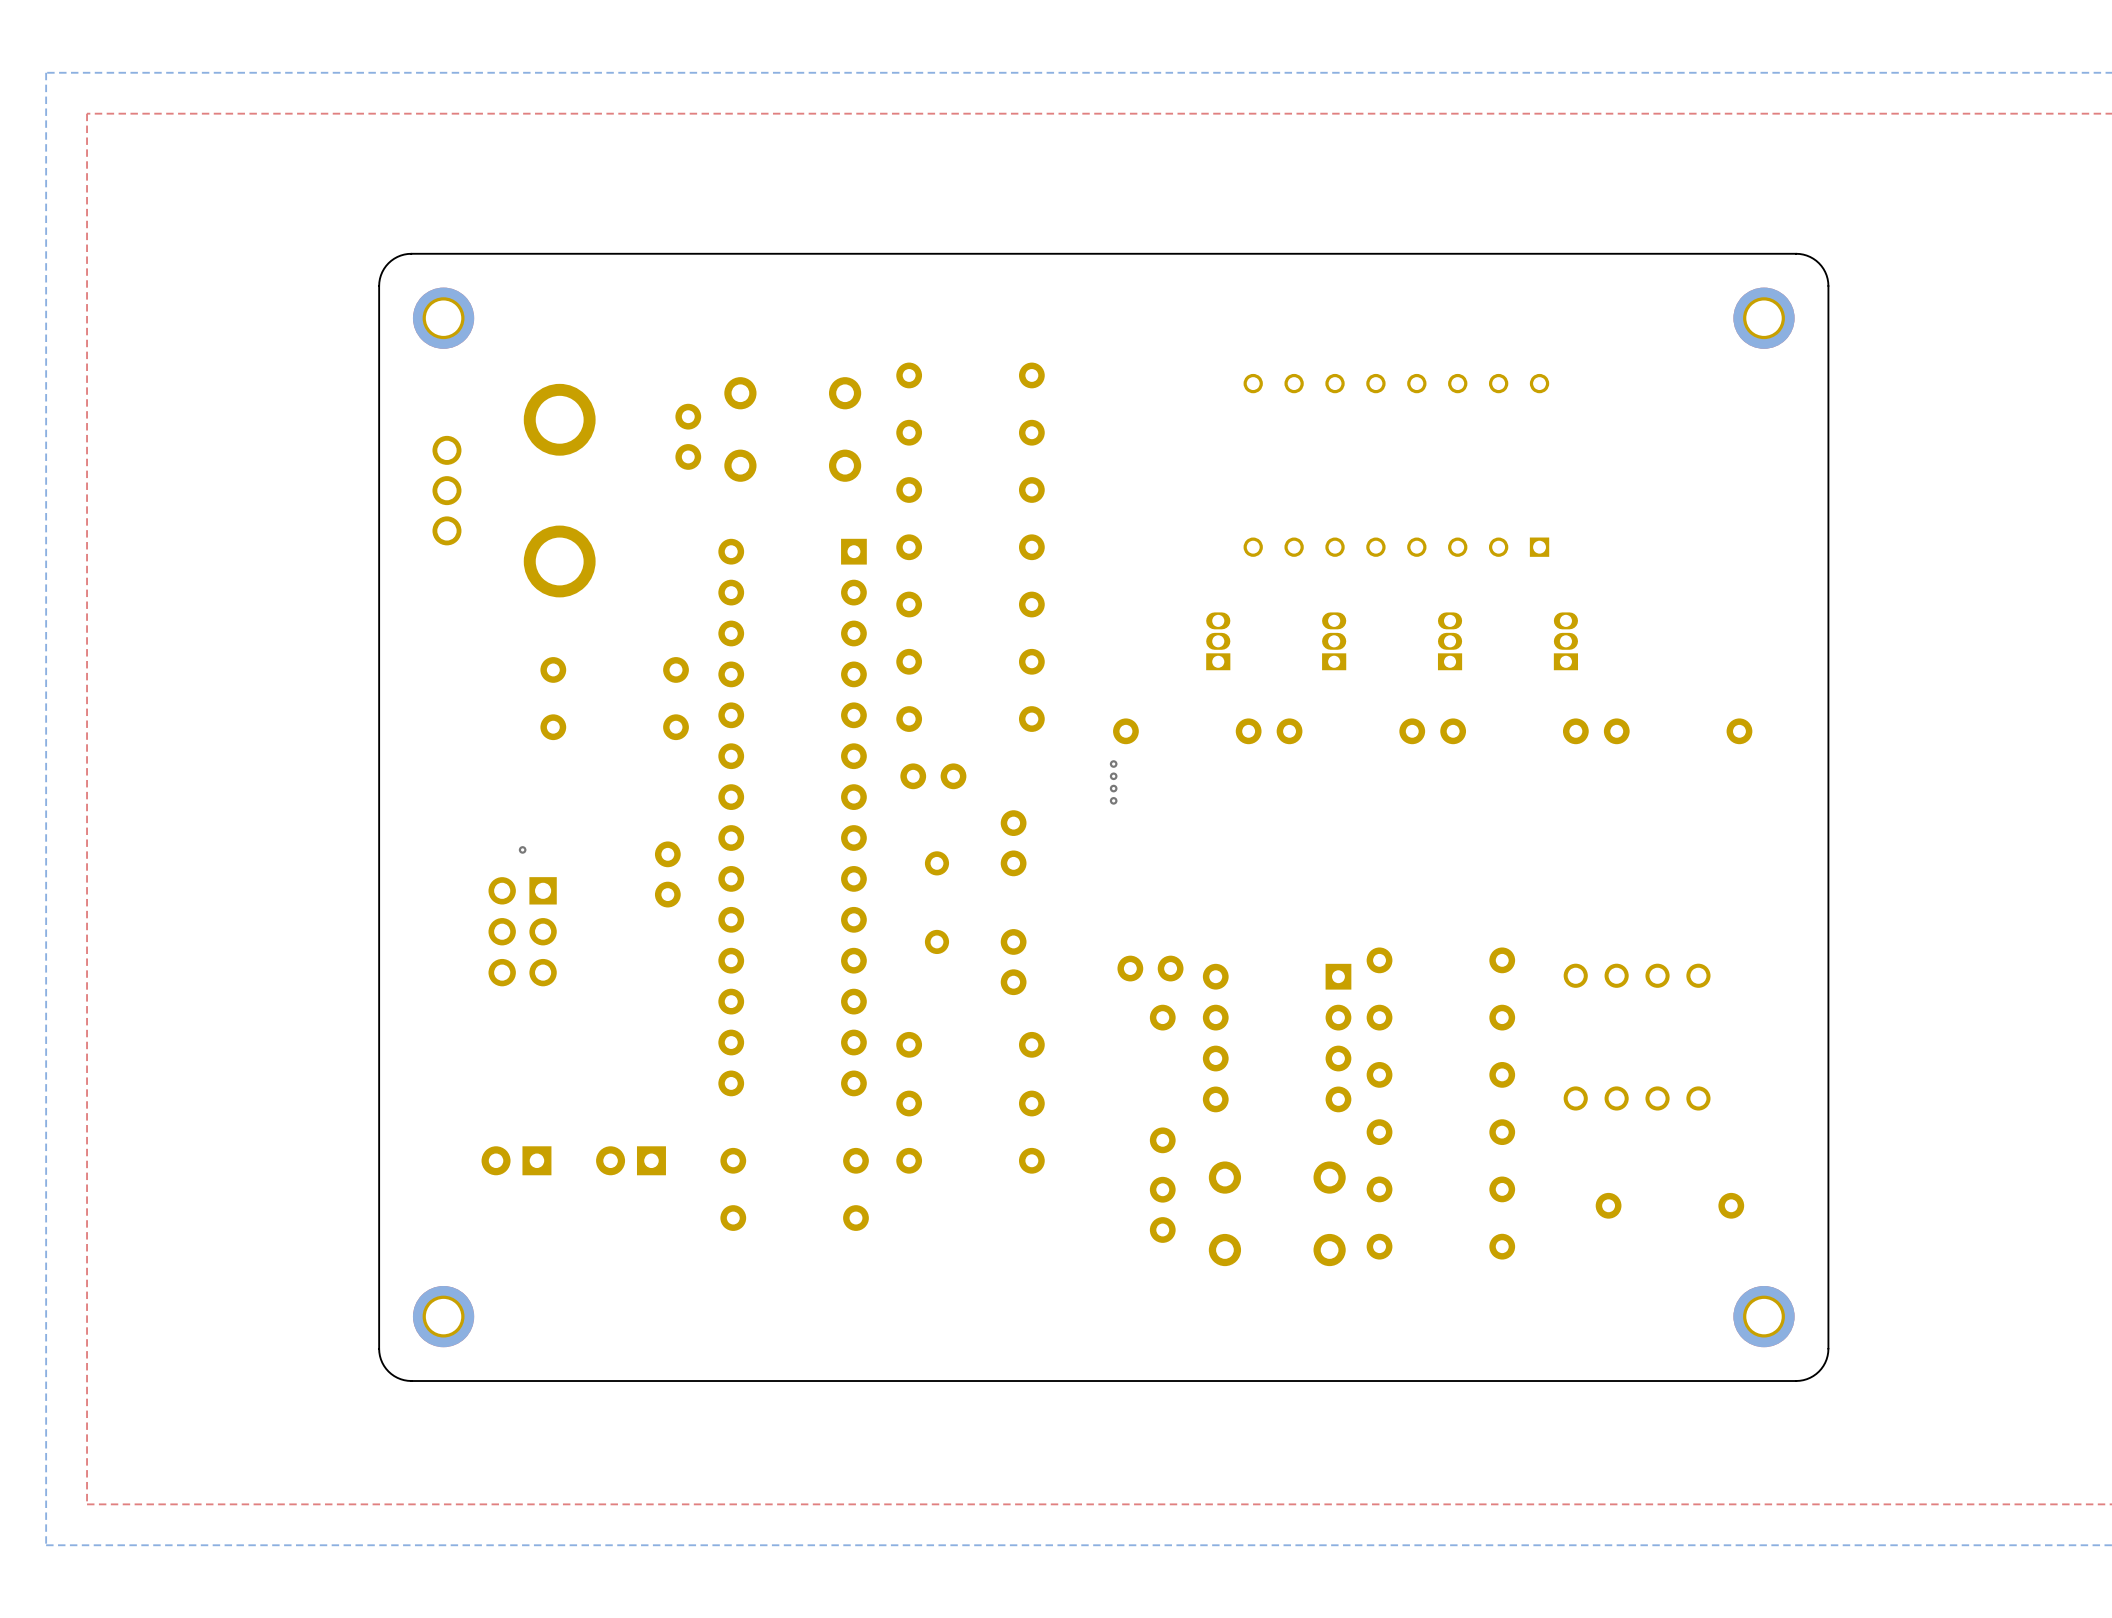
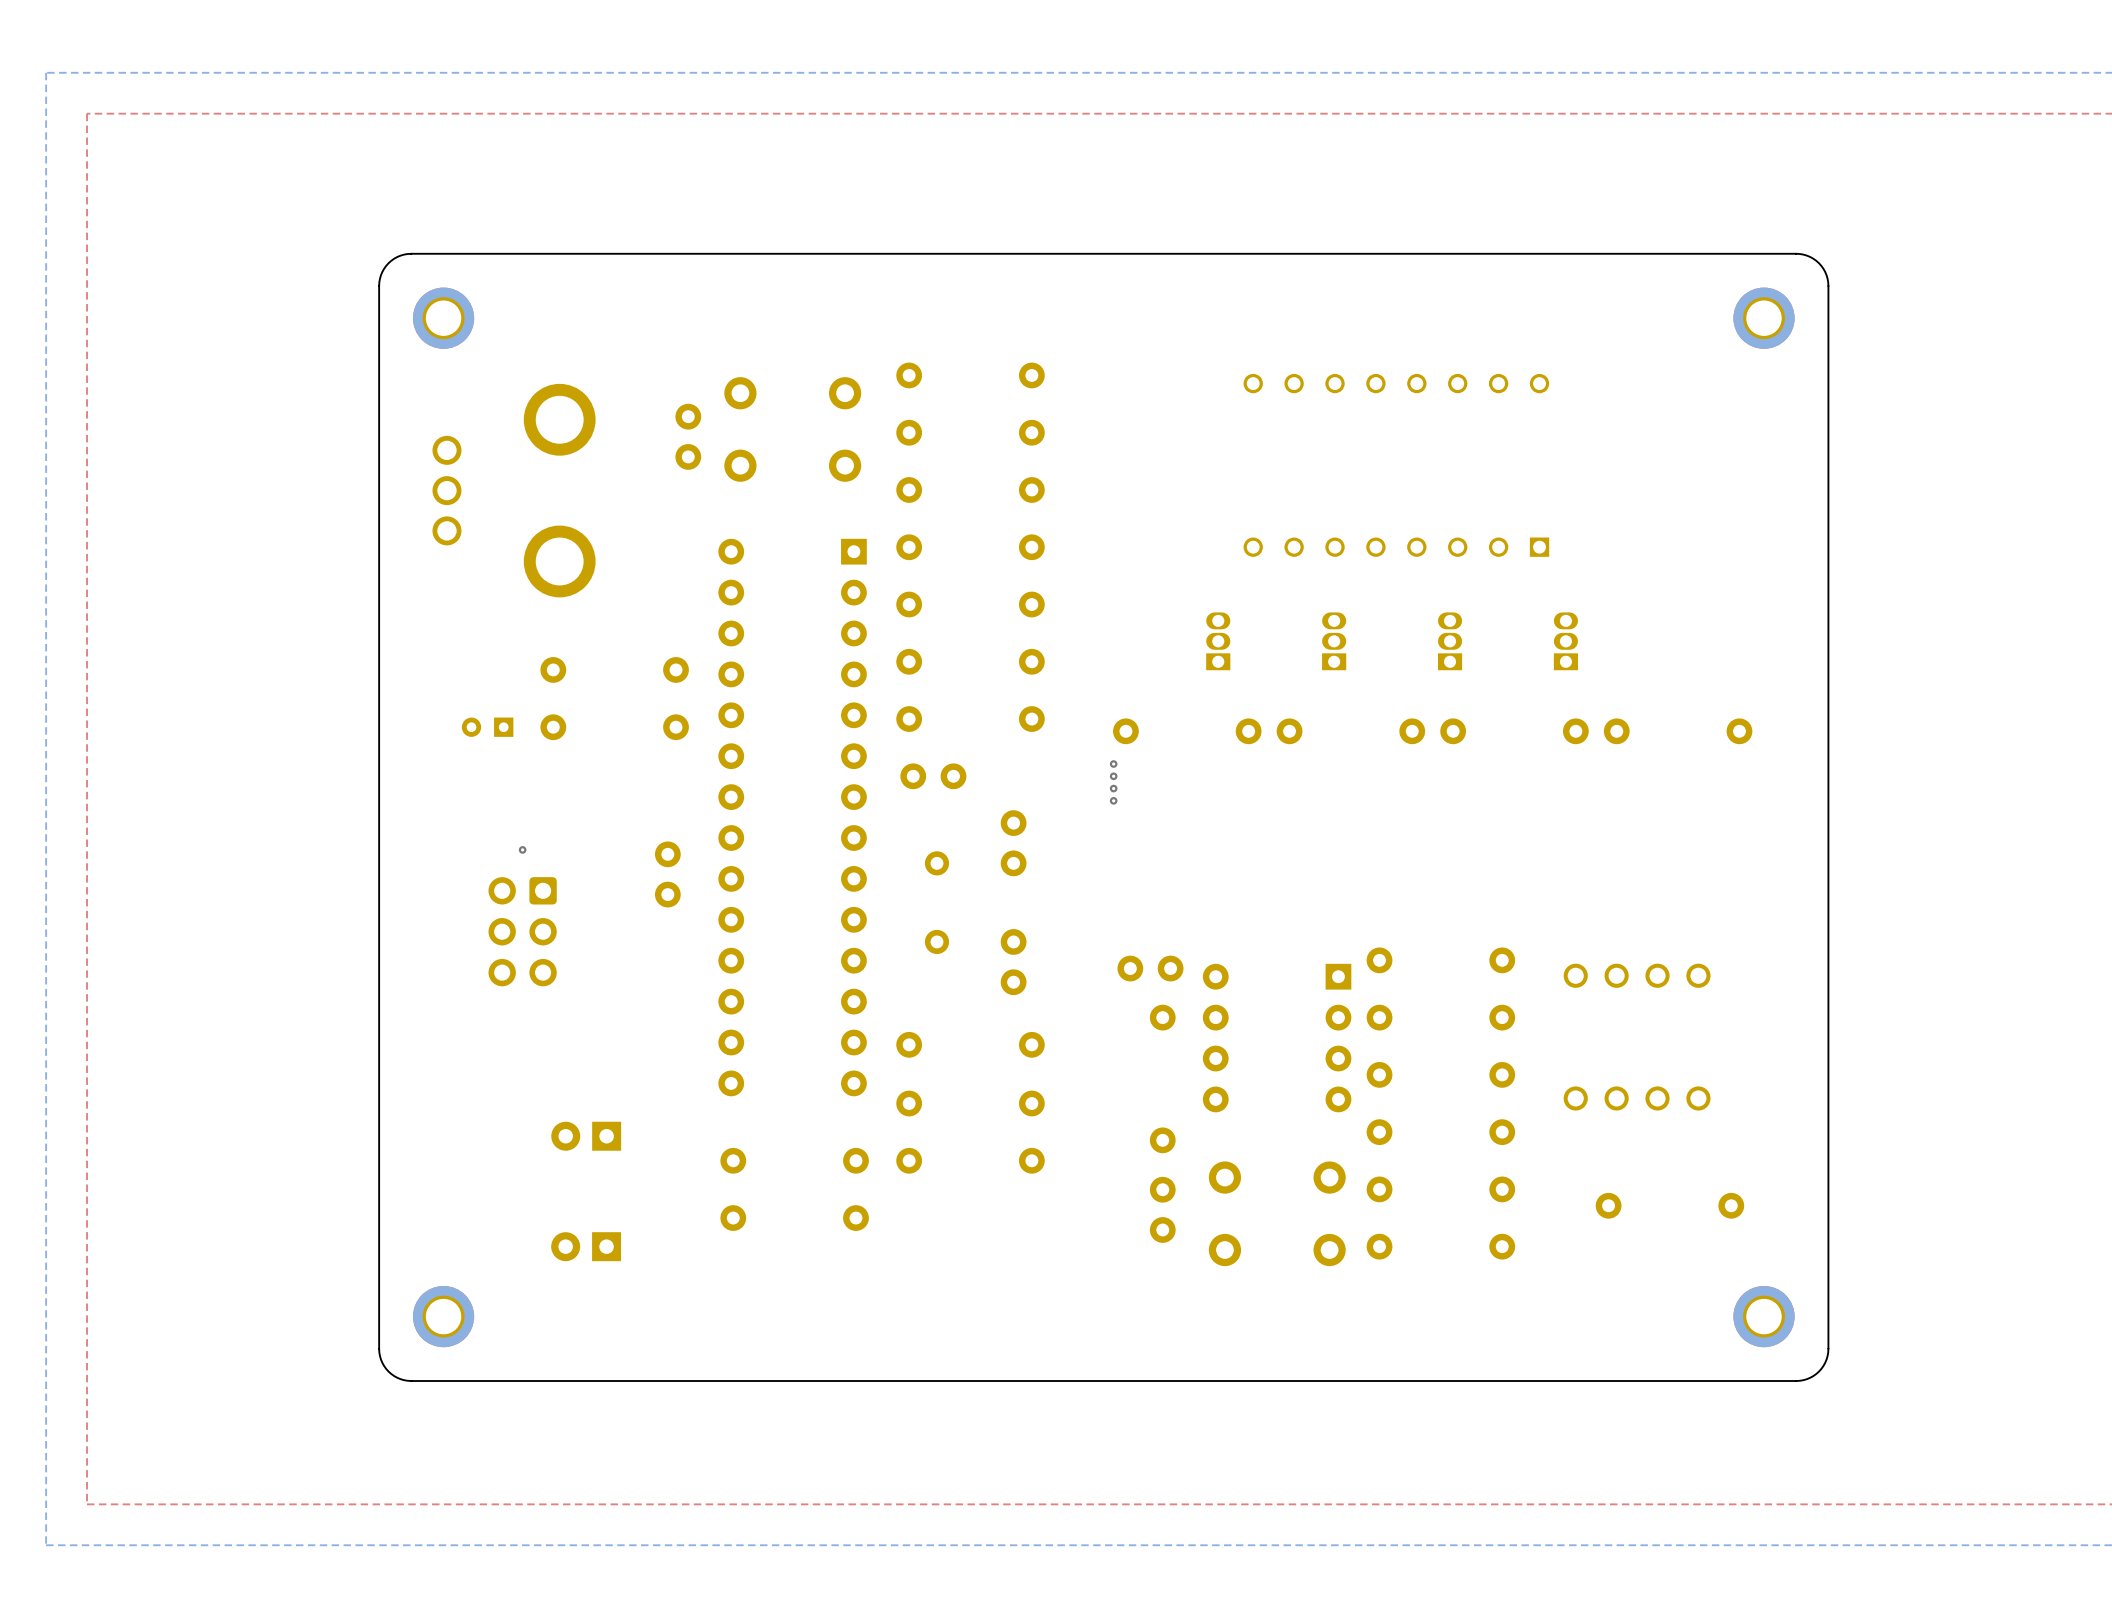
part: none -> (487, 727)
part footprint: [488, 877, 557, 987] -> [488, 877, 557, 987]
part: none -> (586, 1136)
part: (516, 1160) -> none
part: (631, 1160) -> none
part: none -> (586, 1246)

